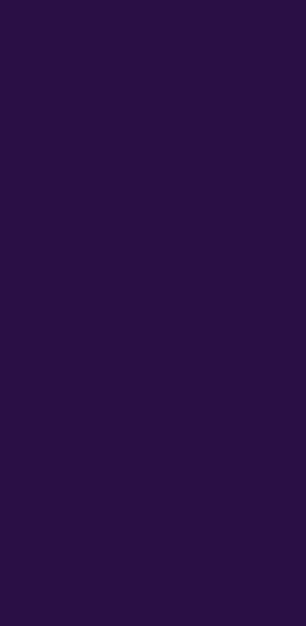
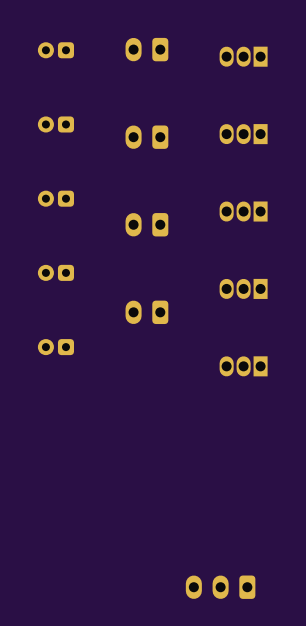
part: none -> (146, 49)
part: none -> (55, 50)
part: none -> (243, 56)
part: none -> (55, 124)
part: none -> (243, 134)
part: none -> (146, 137)
part: none -> (55, 198)
part: none -> (243, 211)
part: none -> (146, 224)
part: none -> (55, 272)
part: none -> (243, 288)
part: none -> (146, 312)
part: none -> (55, 347)
part: none -> (243, 366)
part: none -> (220, 587)

